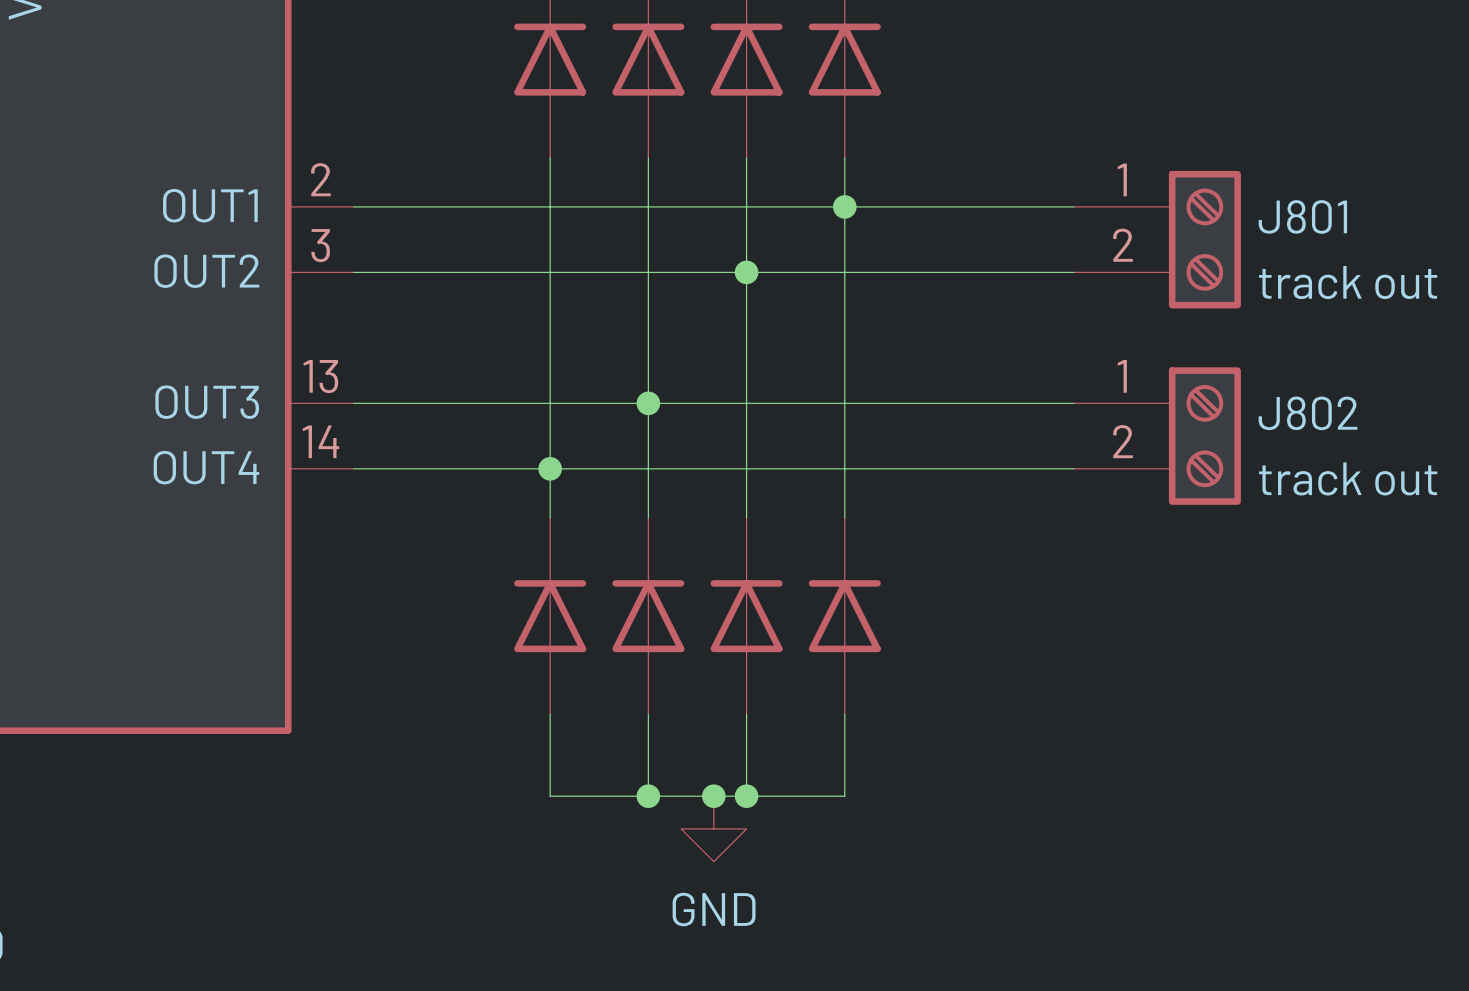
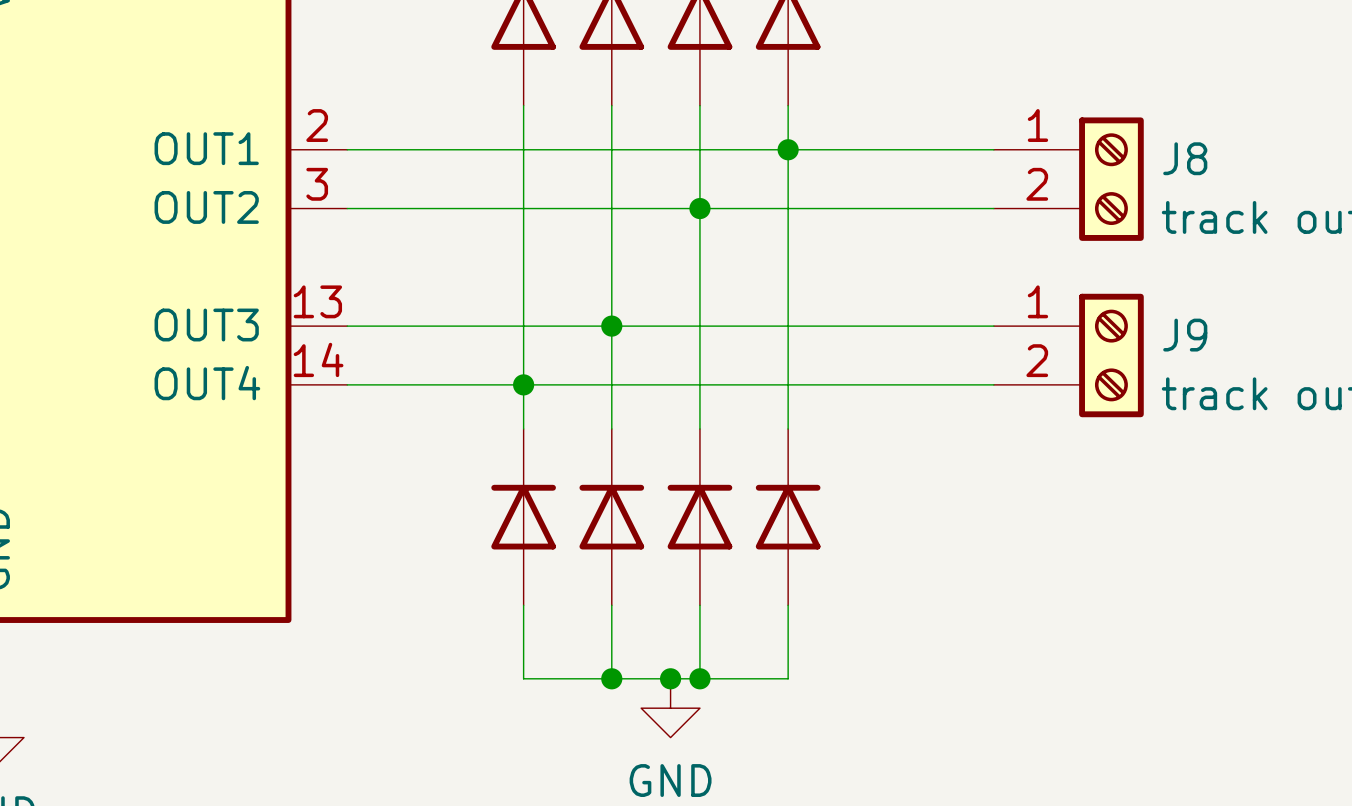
J801 name: J801 (1302, 216) -> J8 (1185, 158)
J802 name: J802 (1308, 413) -> J9 (1185, 335)

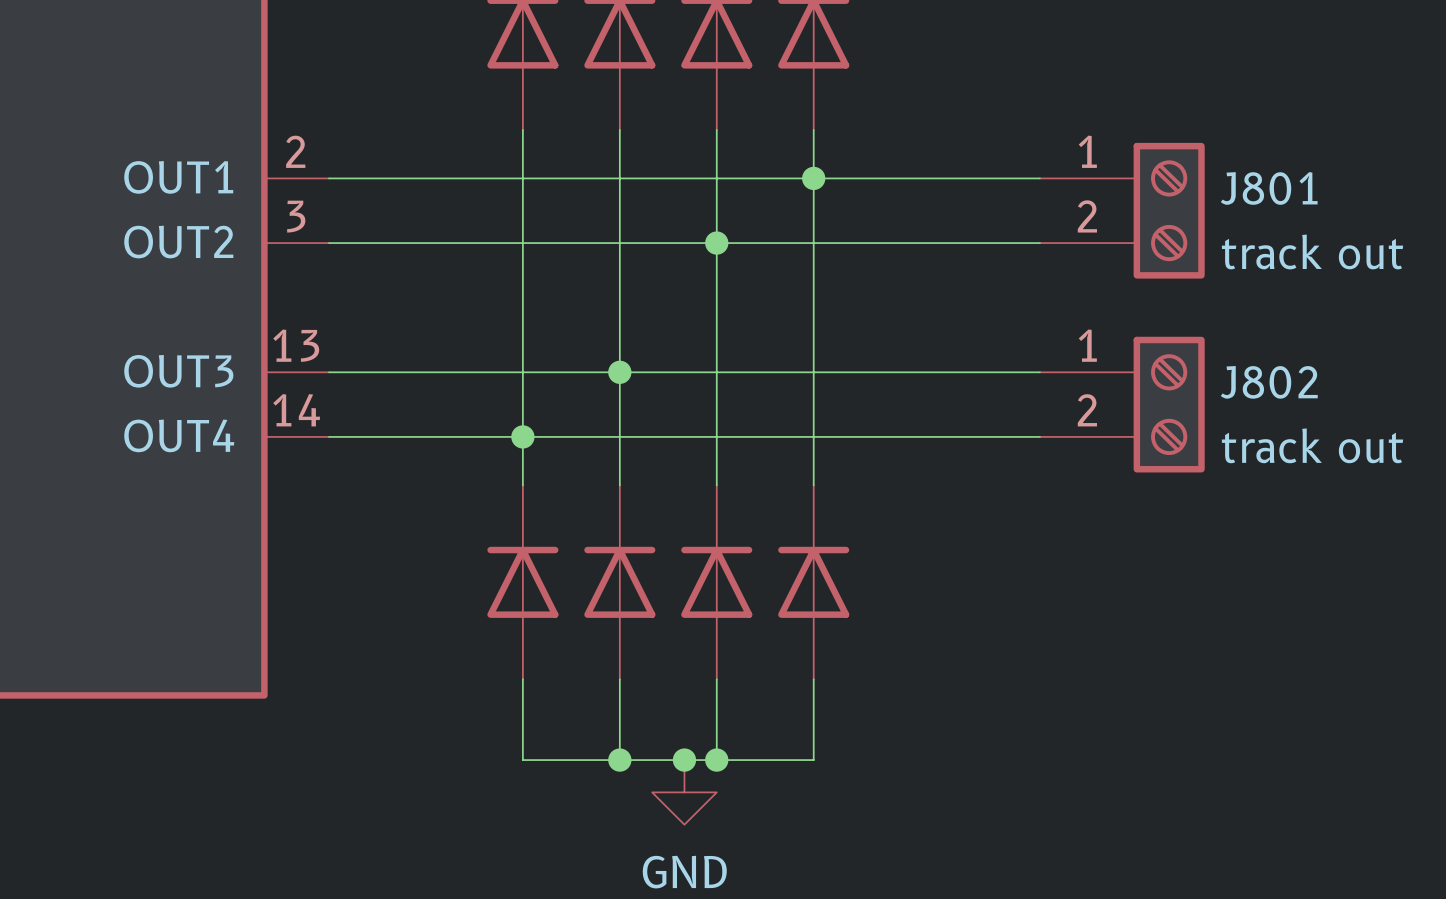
J8 name: J8 (1185, 158) -> J801 (1269, 188)
J9 name: J9 (1185, 335) -> J802 (1269, 382)

